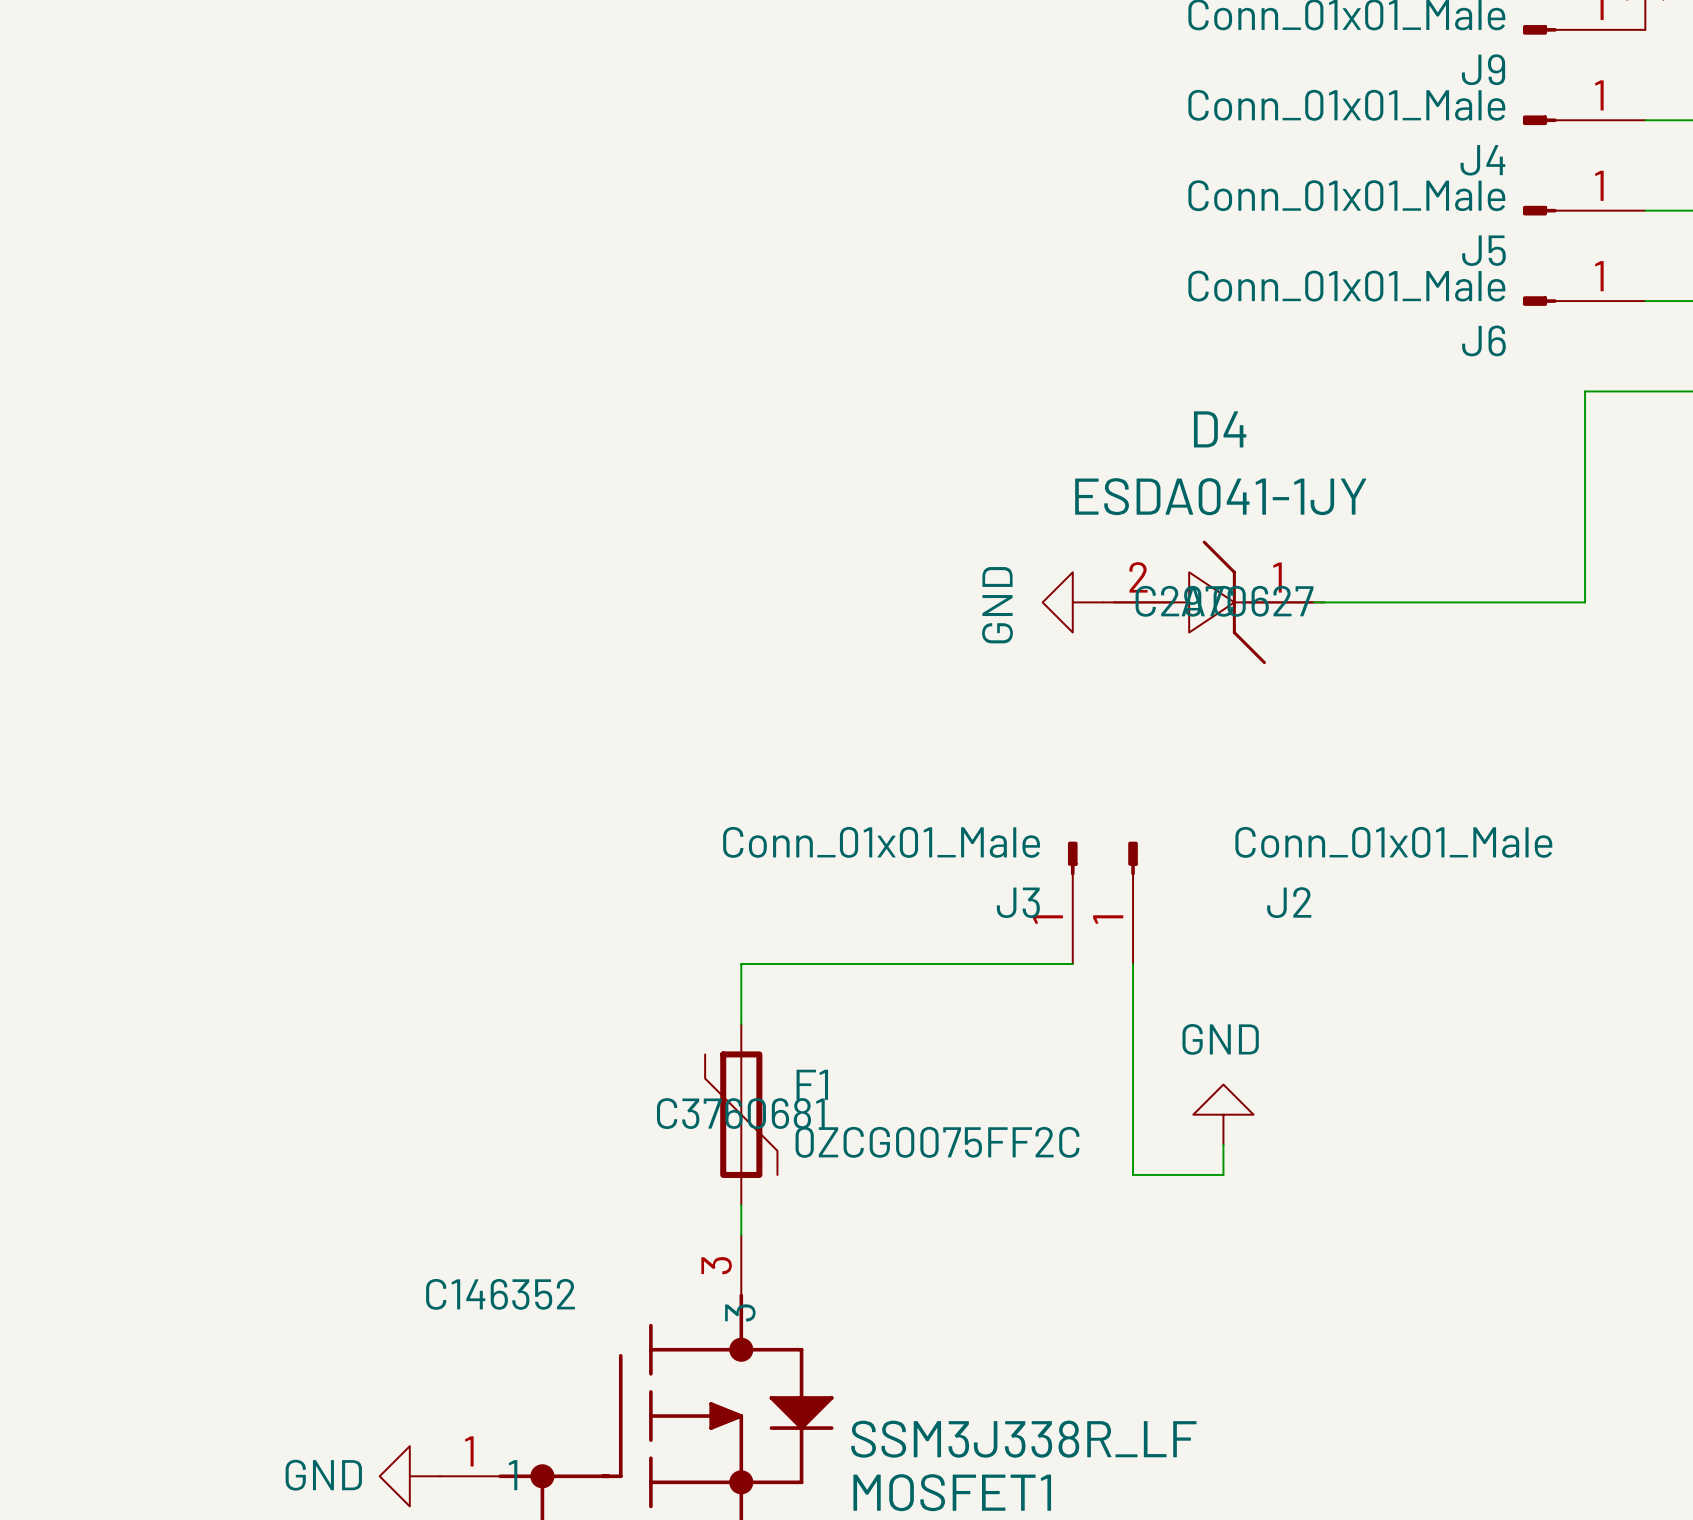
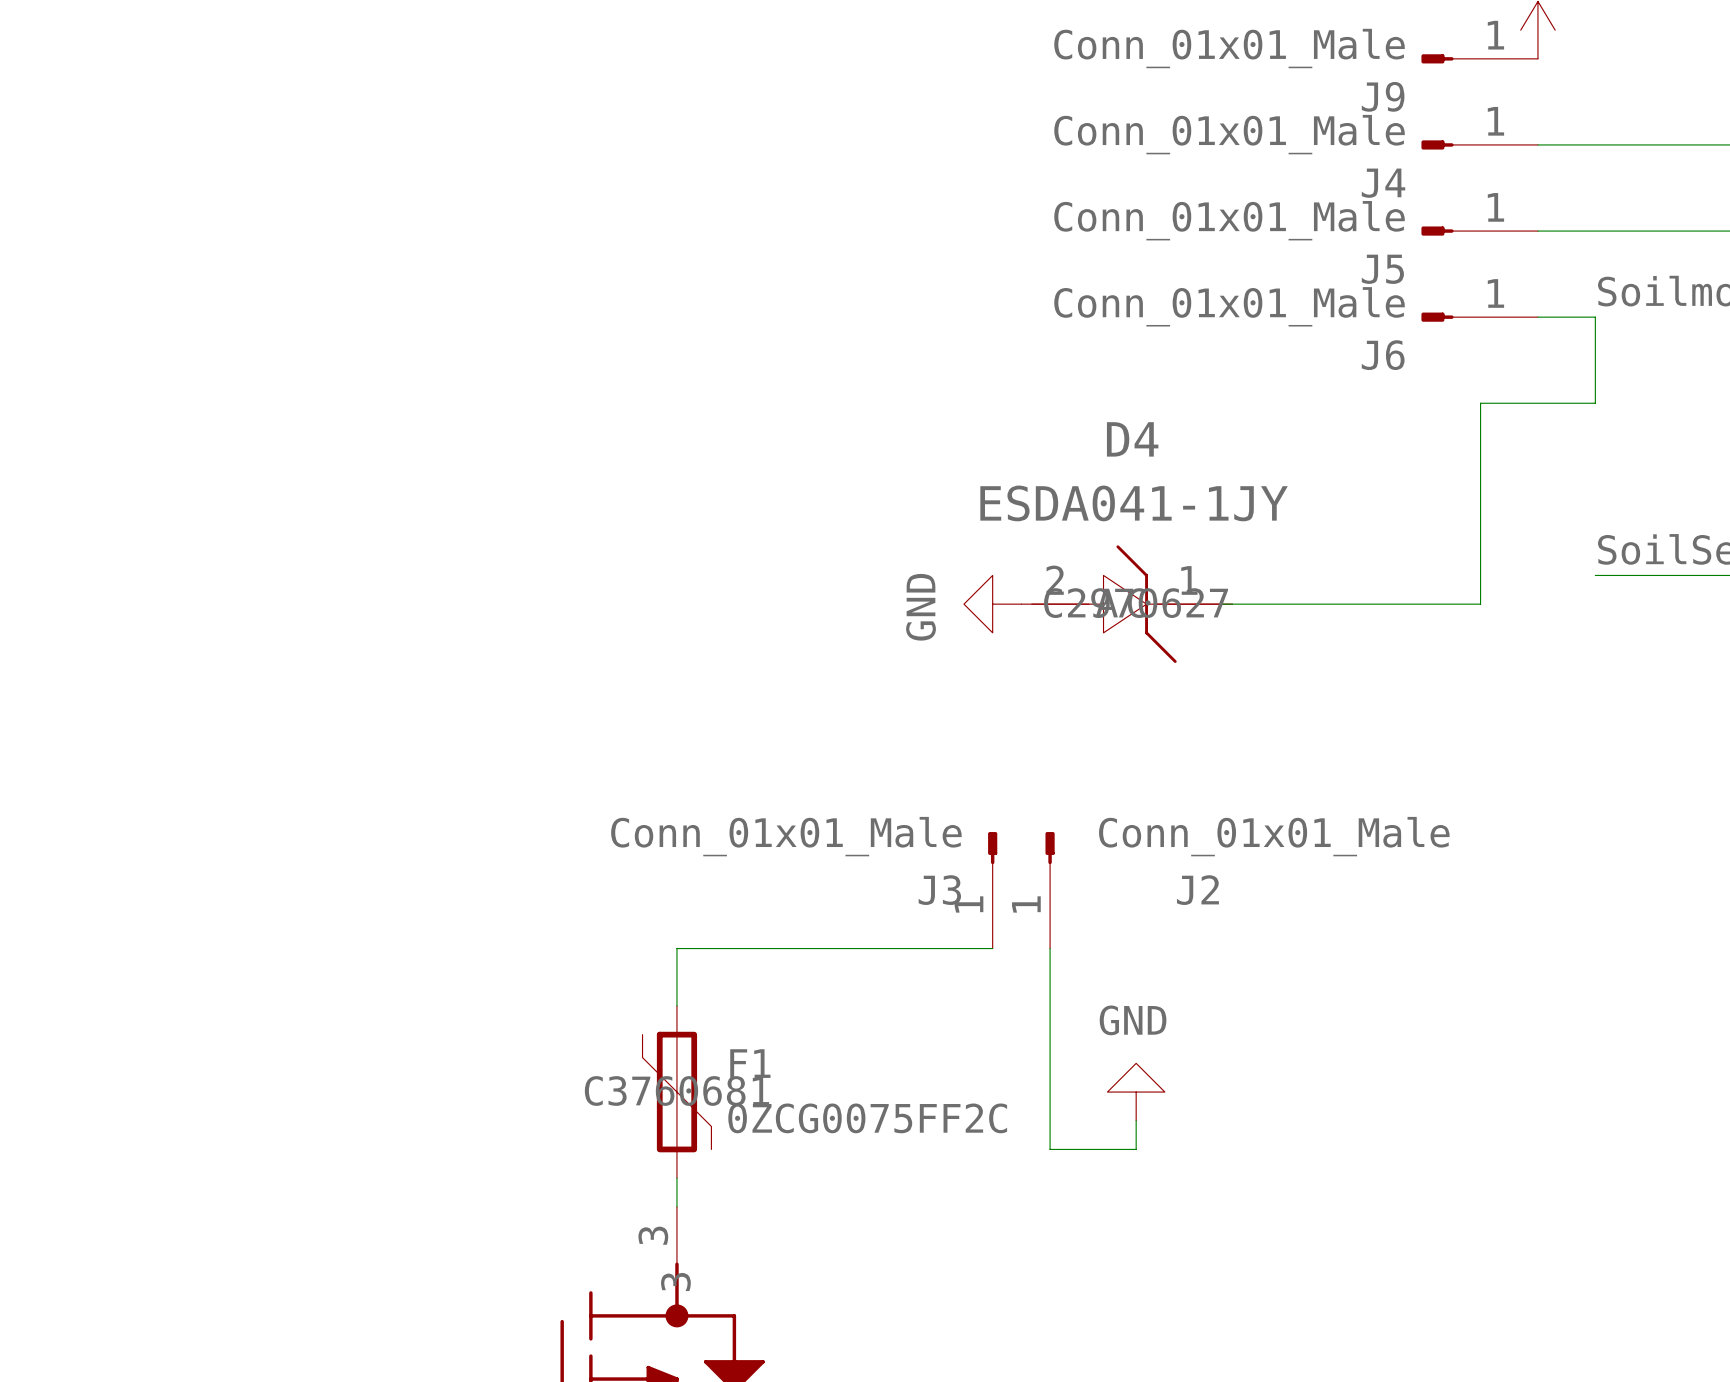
MOSFET1 text: C146352 (500, 1294) -> none

